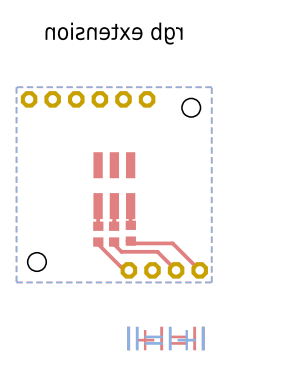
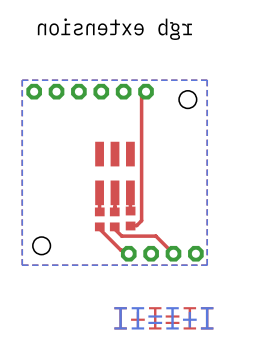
top track: (130, 241) (127, 241) (129, 243) (172, 243) (199, 270) -> (130, 225) (136, 225) (141, 220) (141, 96) (146, 91)

